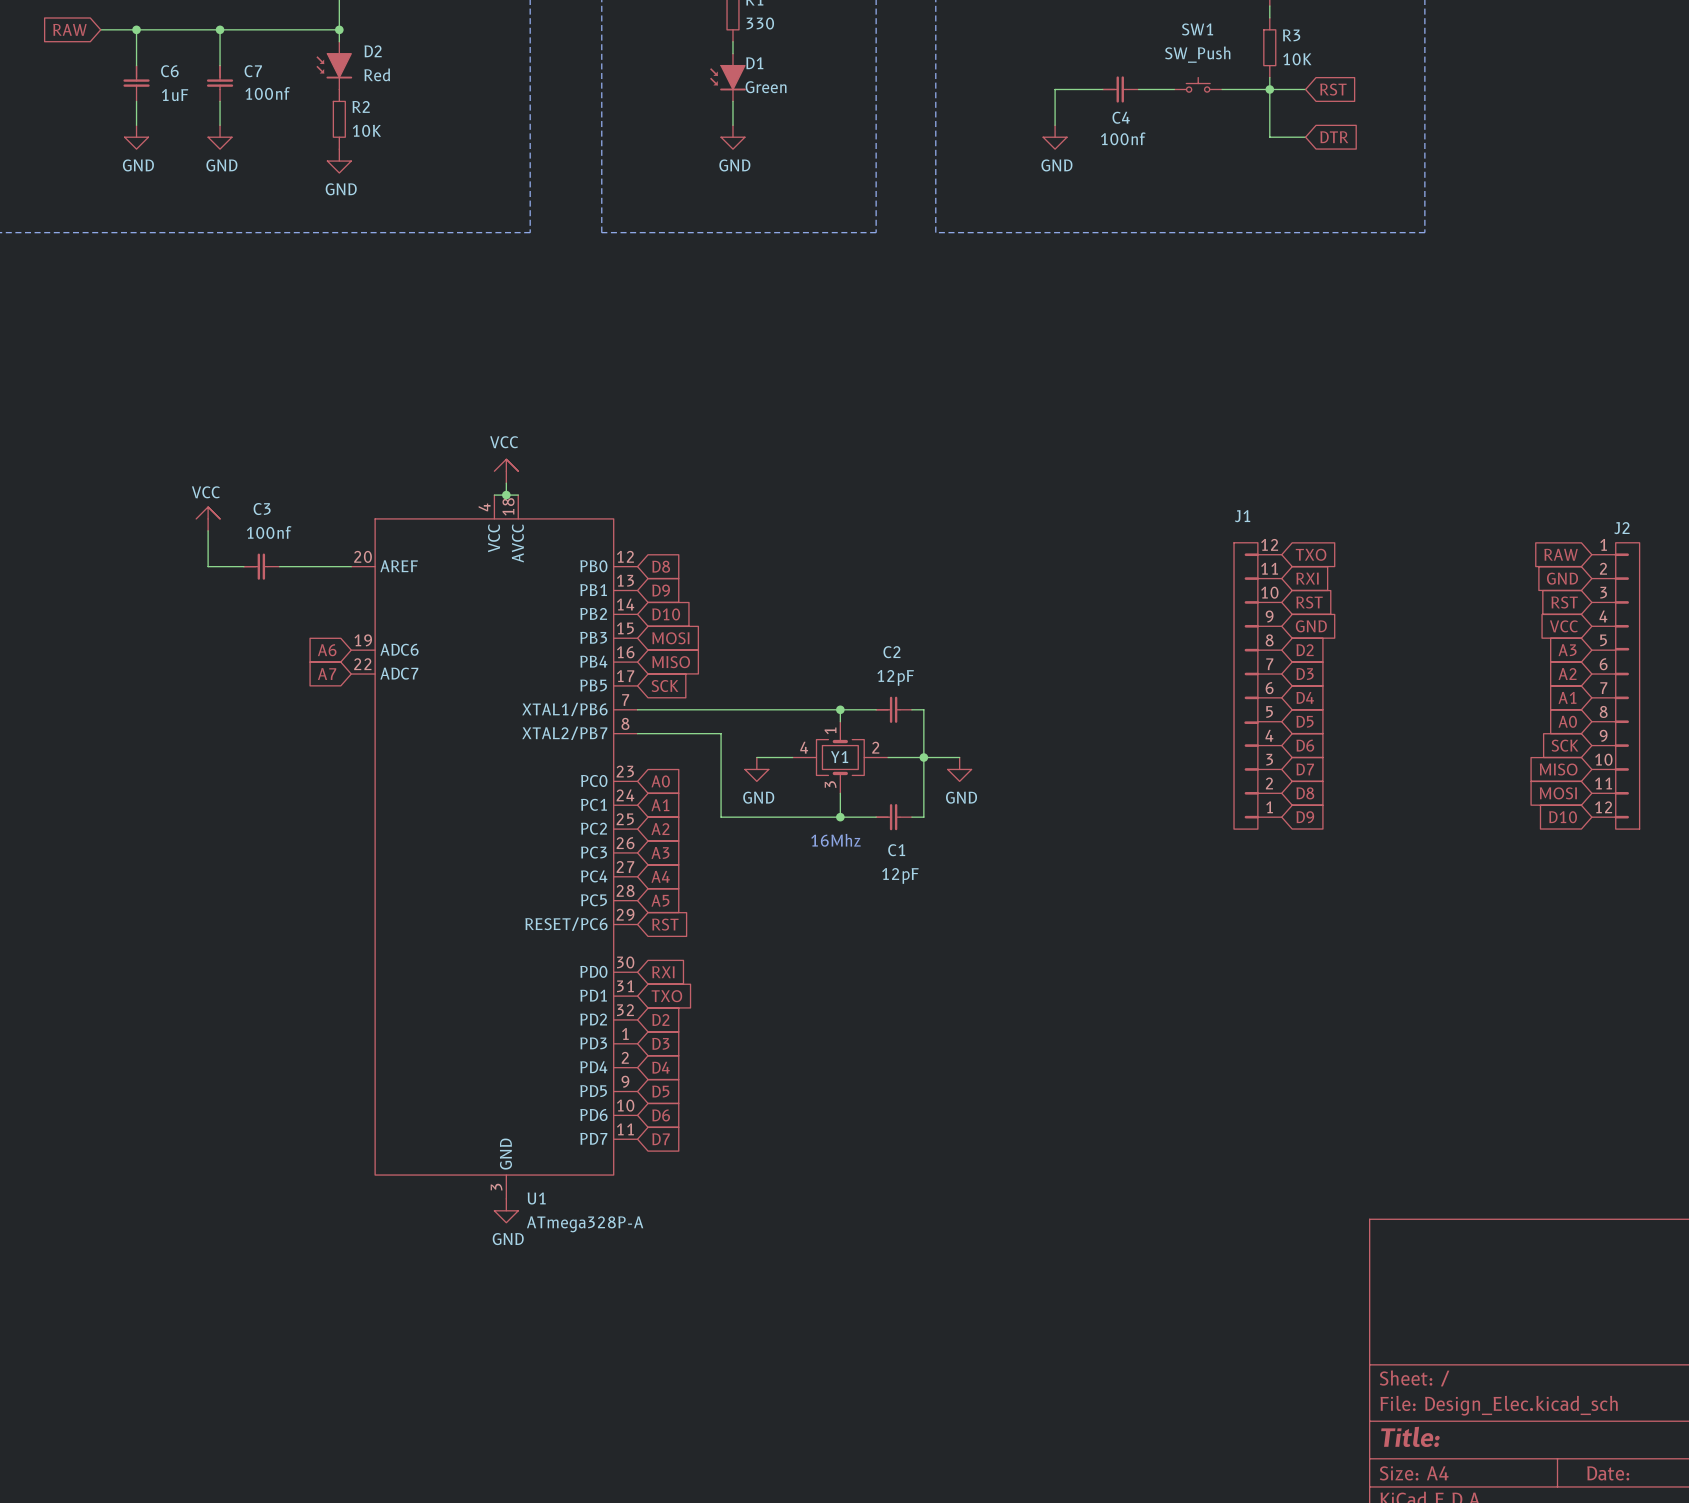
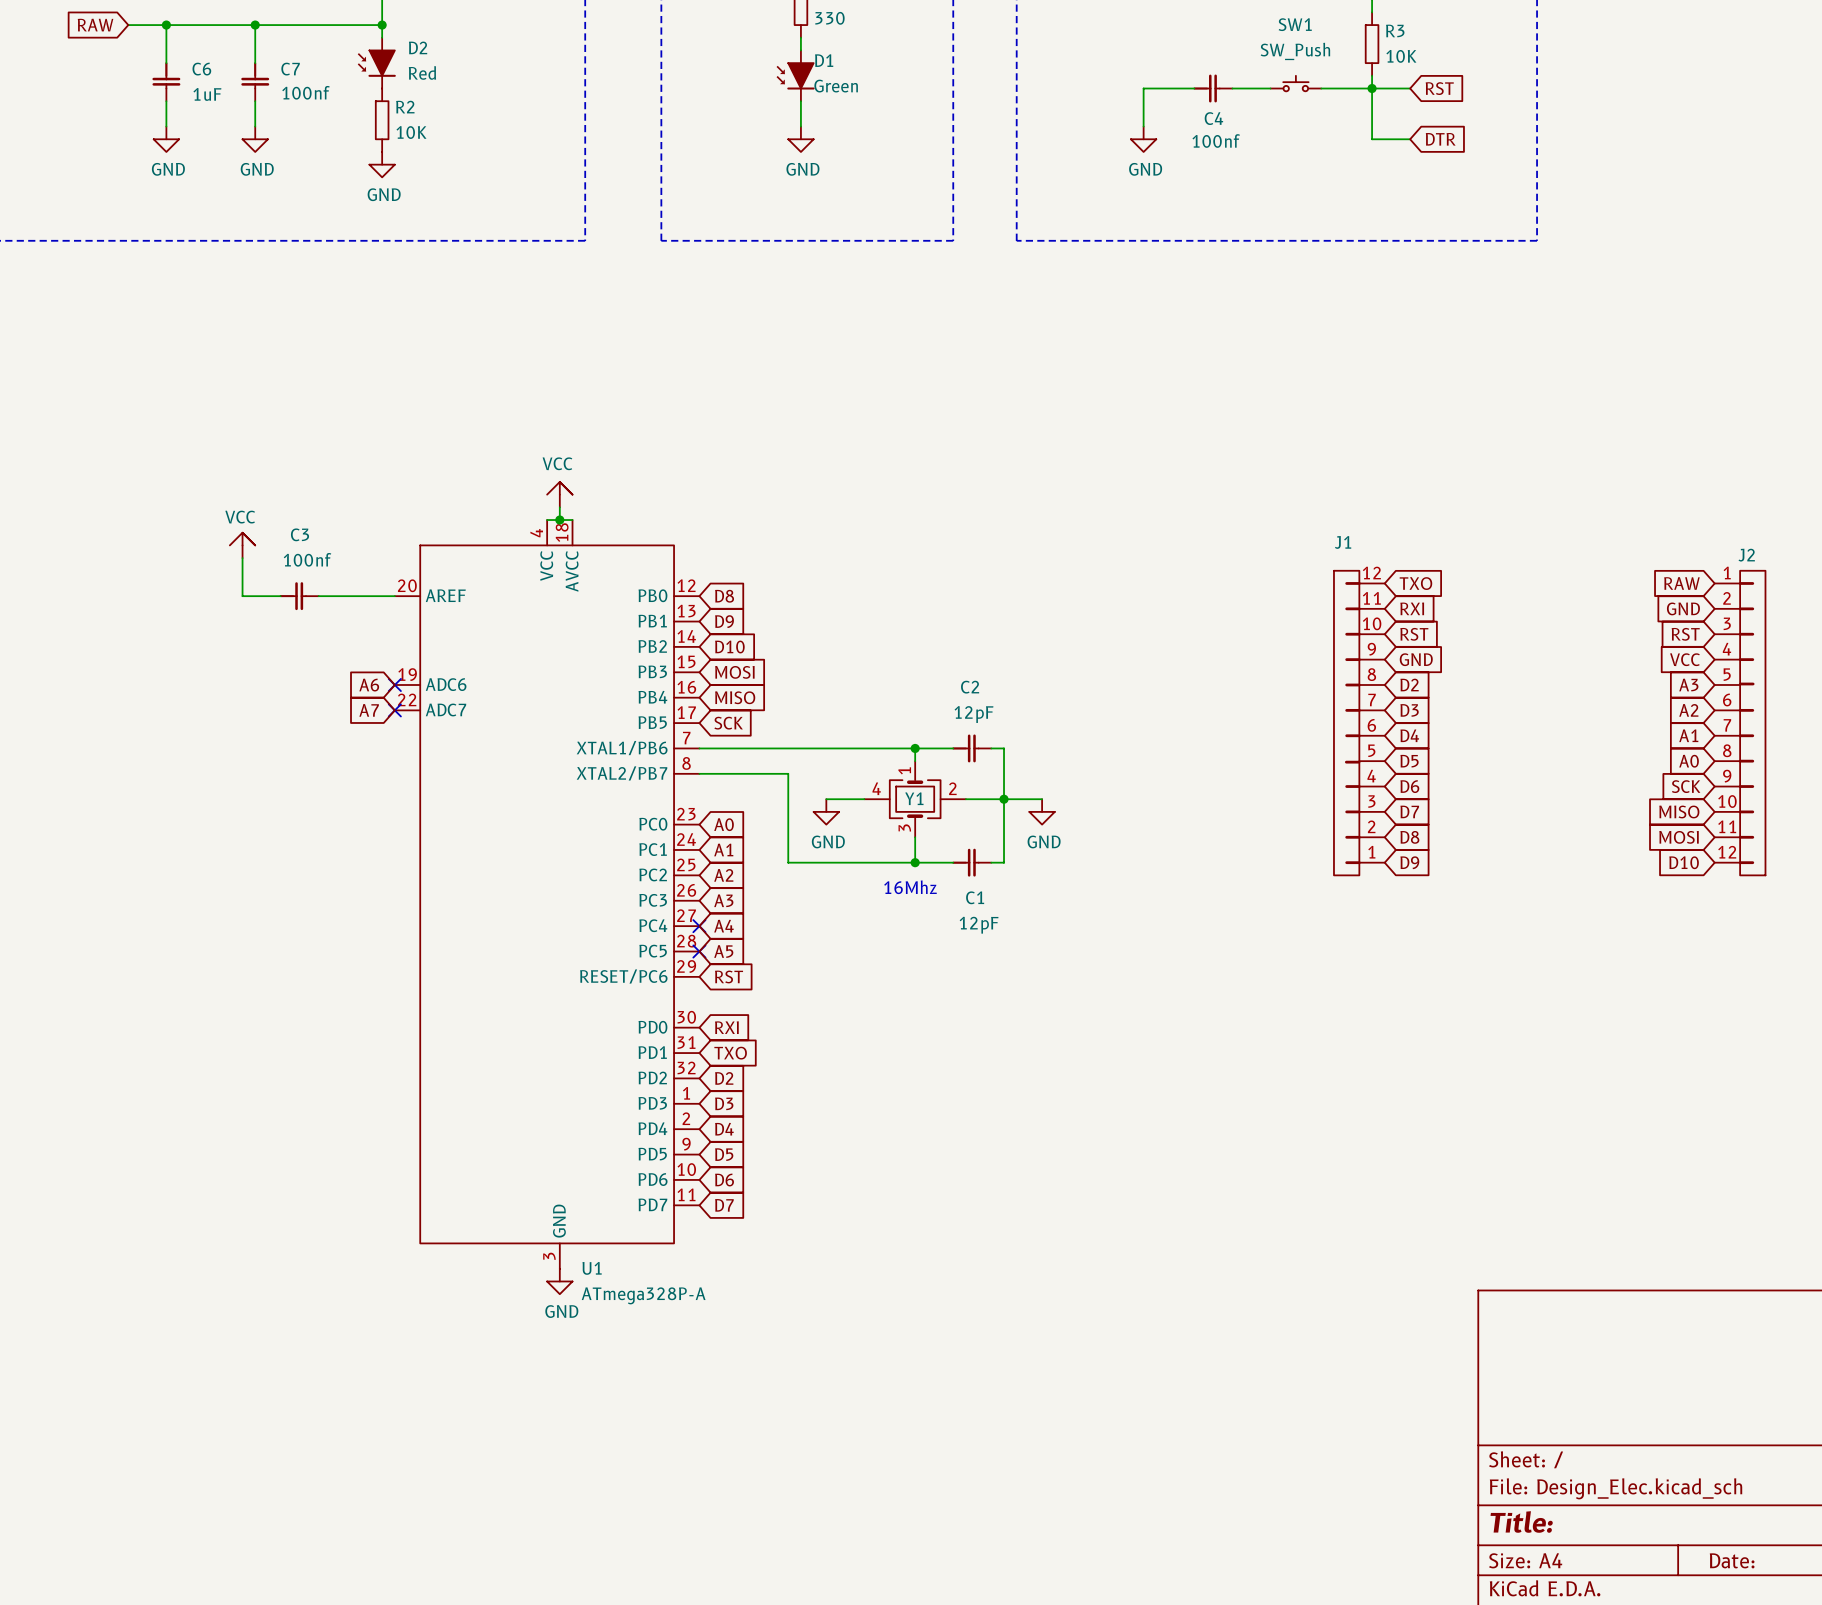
no-connect mark: none -> (394, 685)
no-connect mark: none -> (394, 710)
no-connect mark: none -> (699, 926)
no-connect mark: none -> (699, 951)

